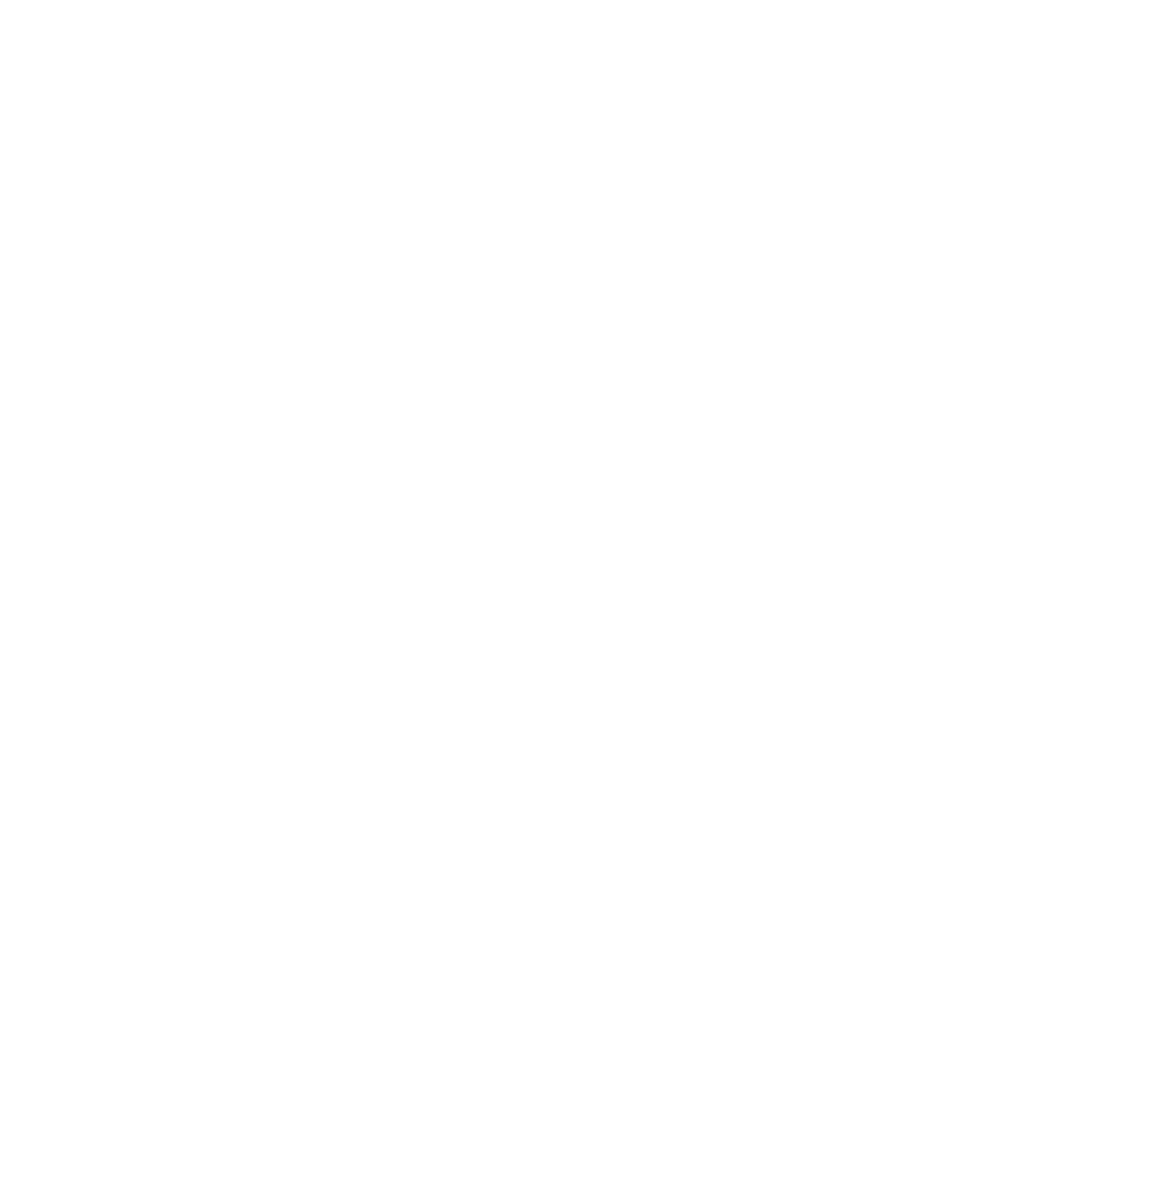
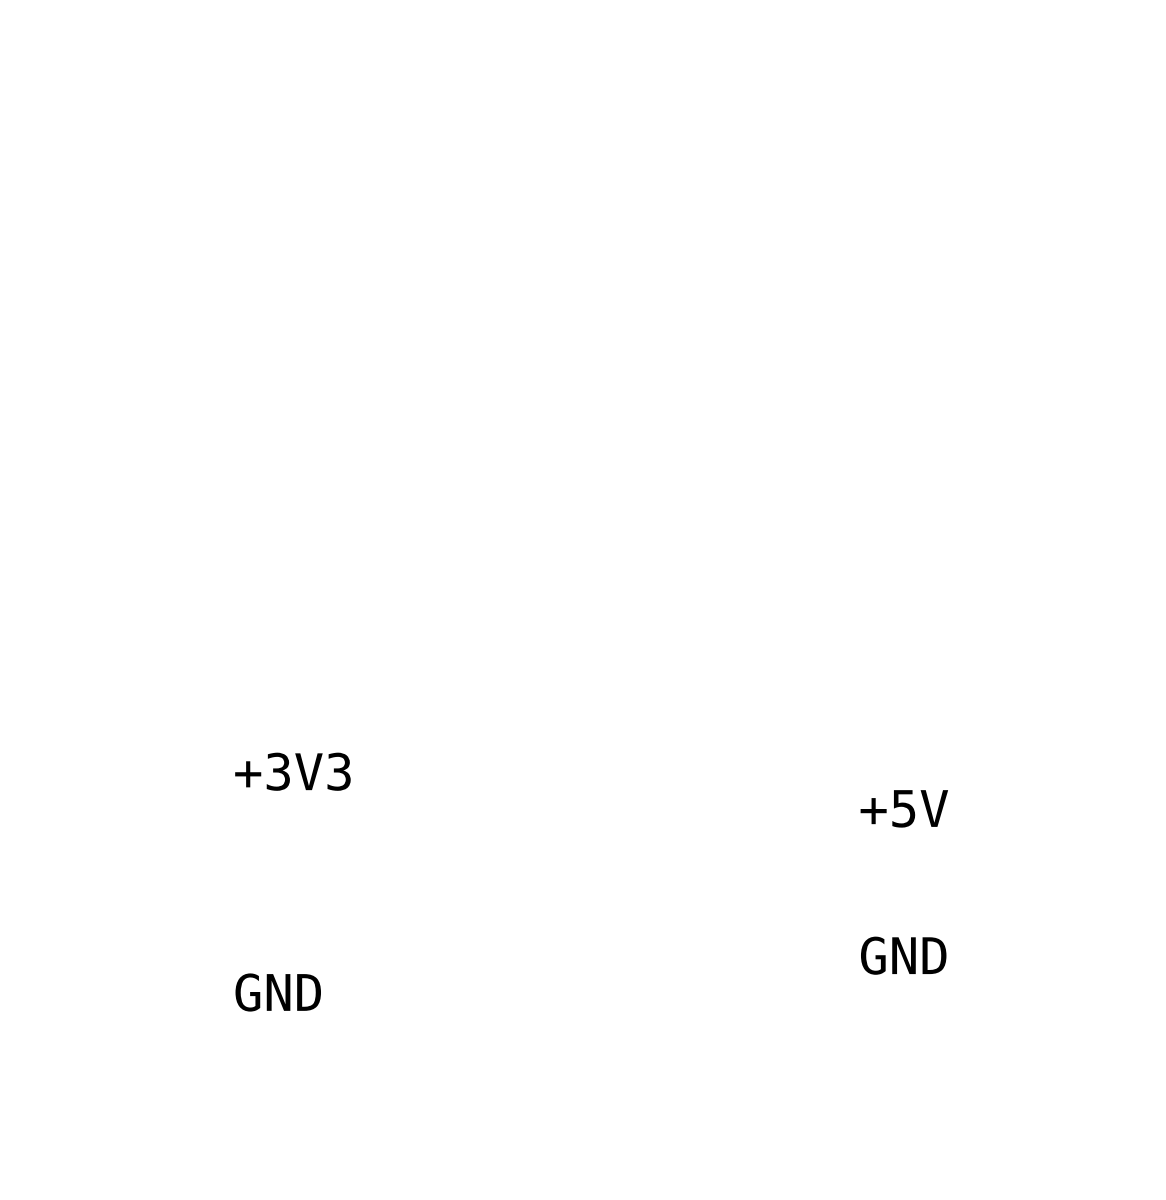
label: none -> +3V3 (292, 771)
label: none -> +5V (904, 808)
label: none -> GND (903, 955)
label: none -> GND (278, 992)

